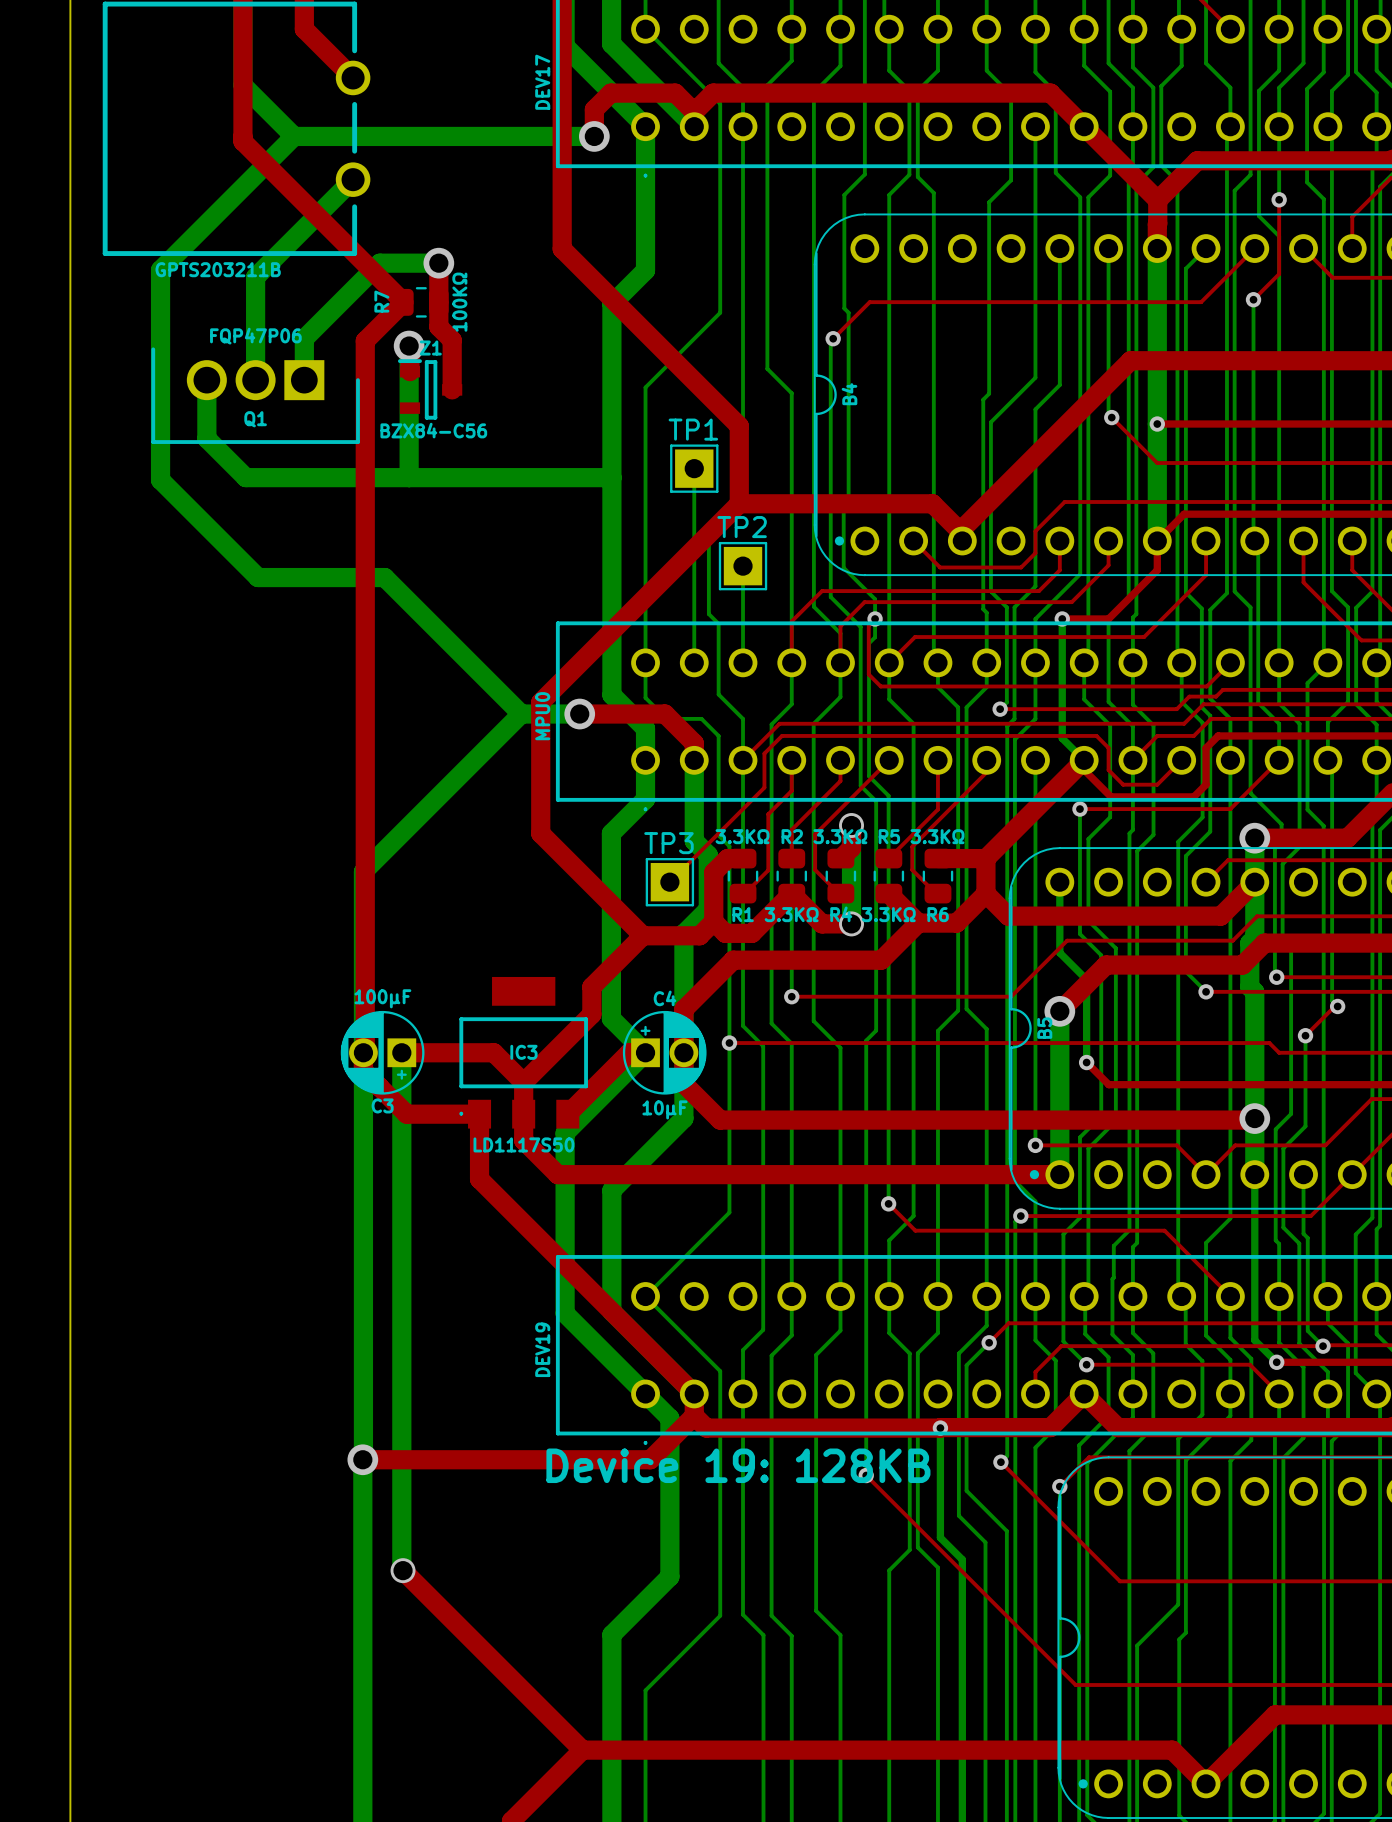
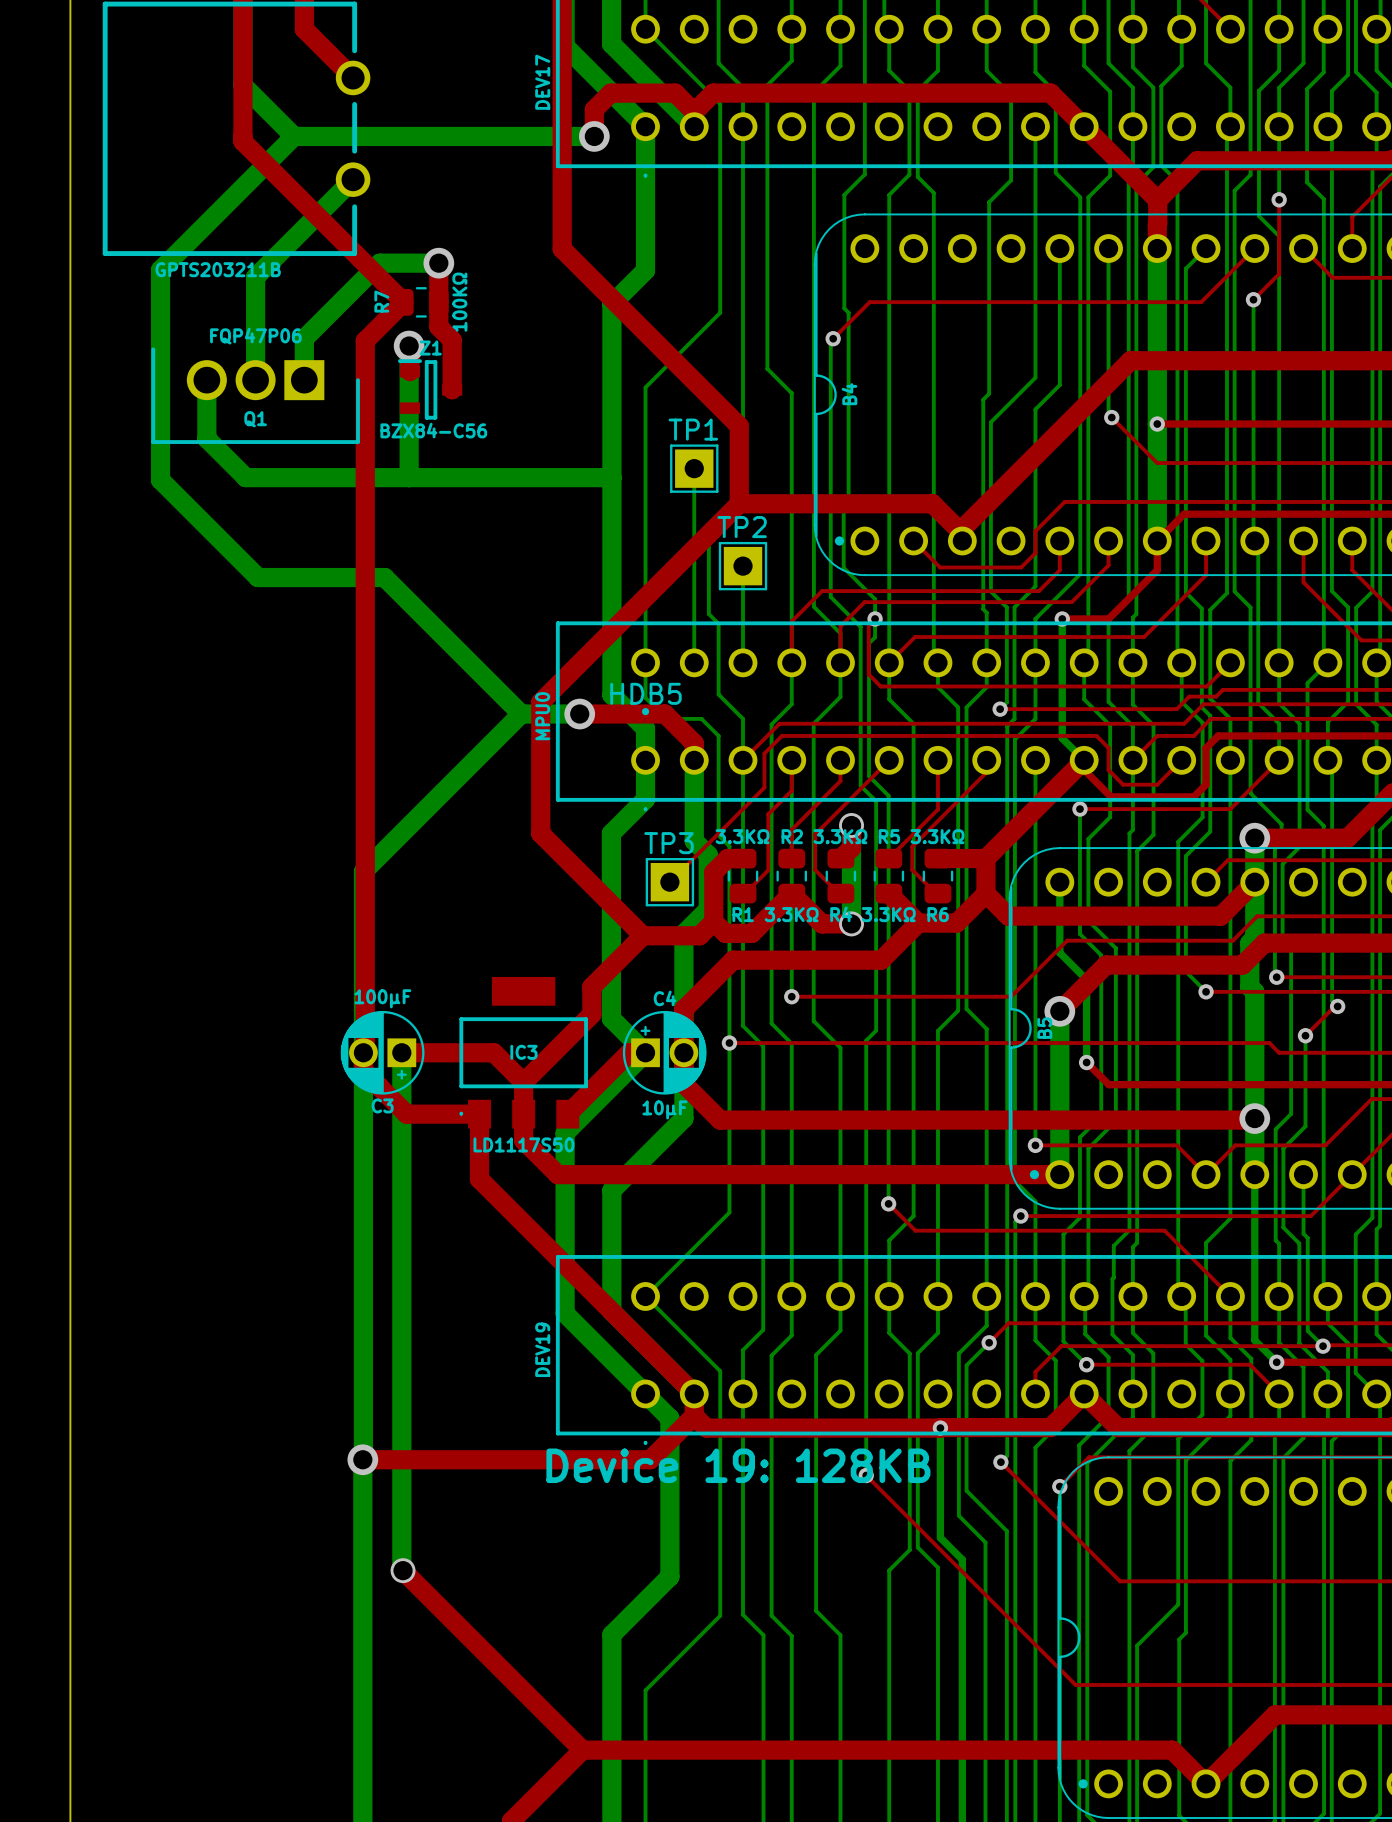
HDB5: none -> (645, 711)

